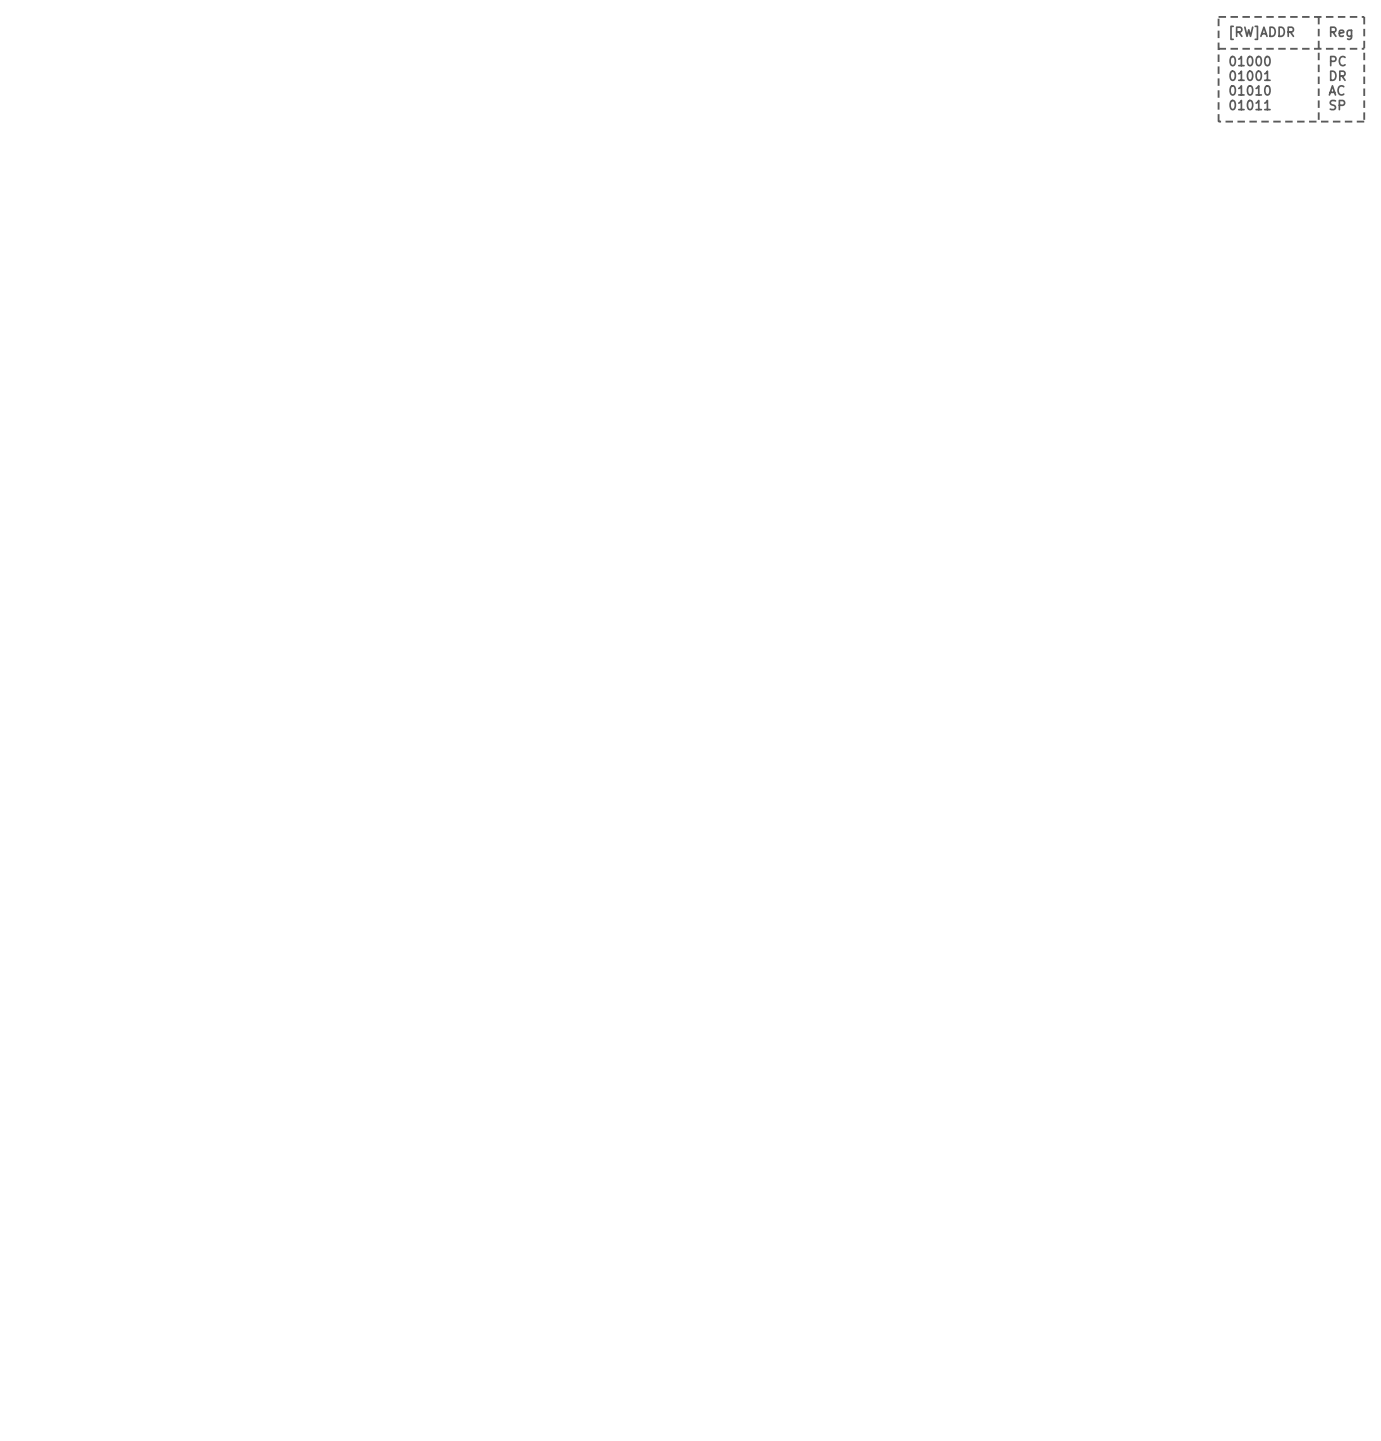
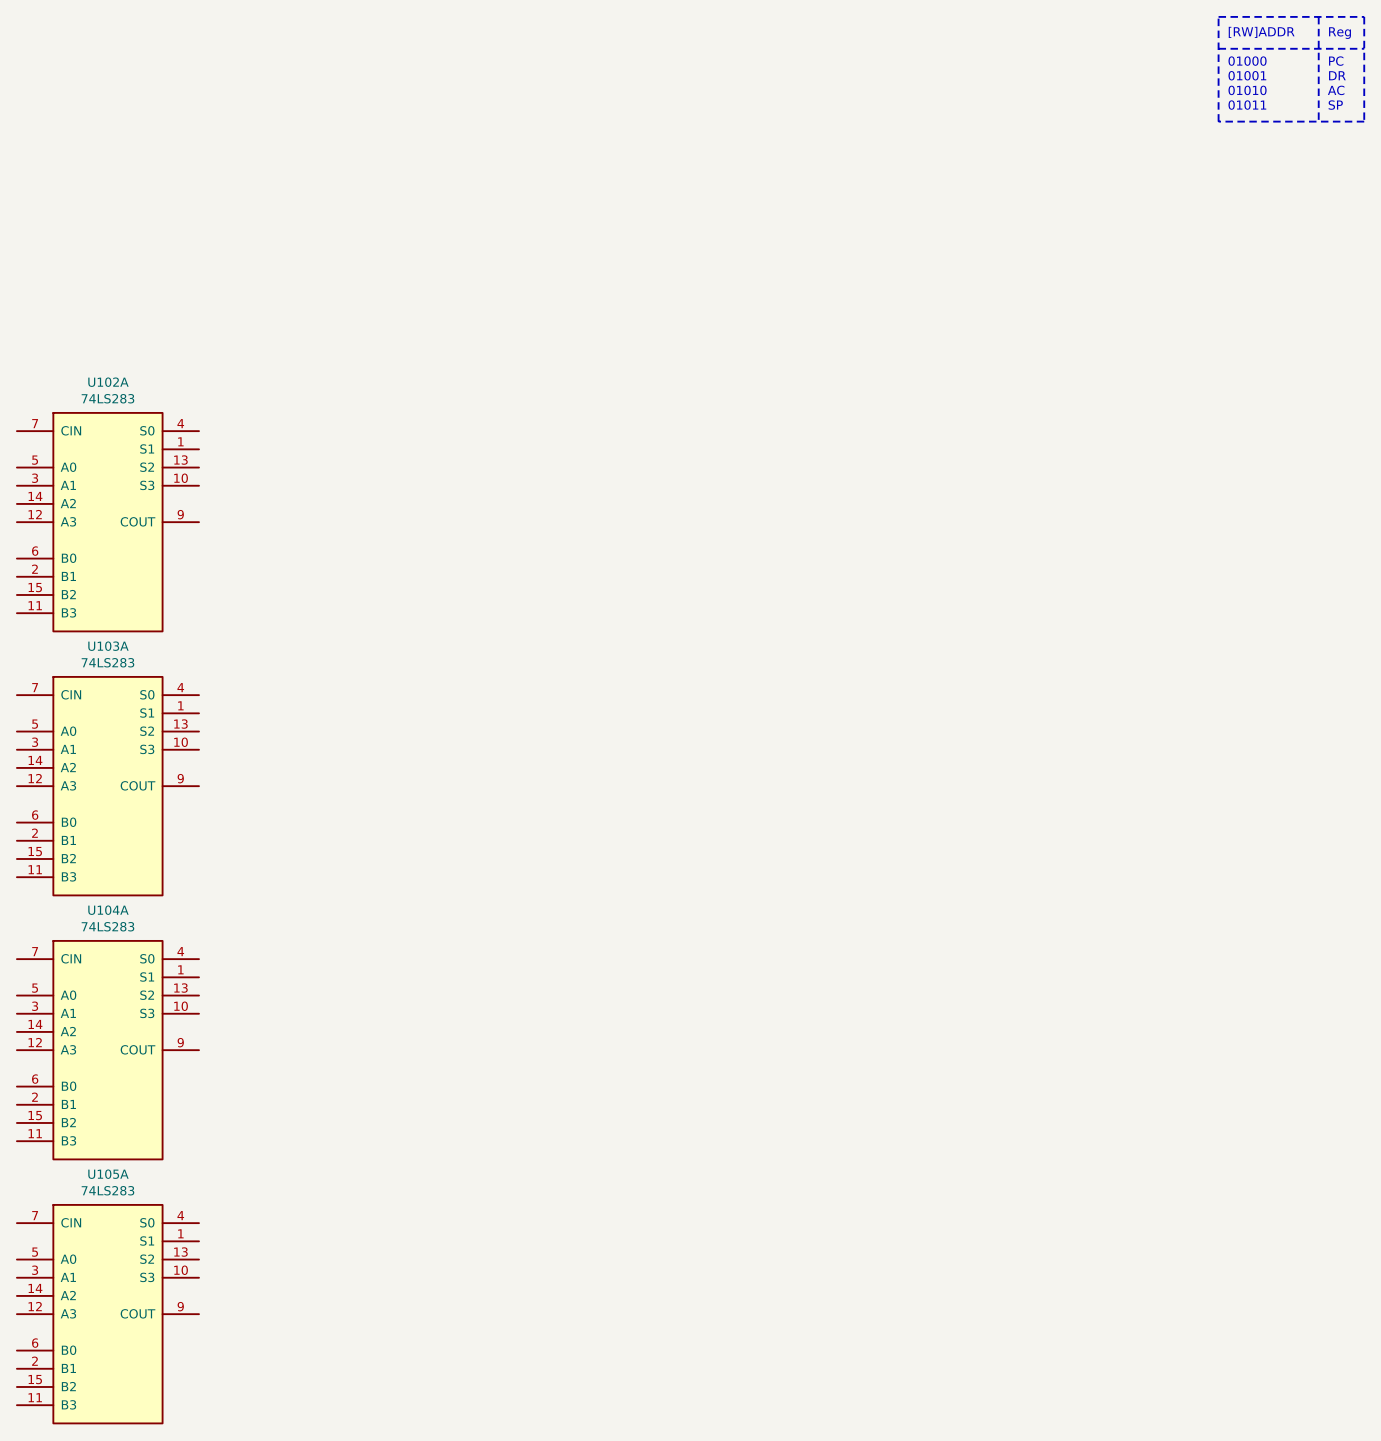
U102A: none -> 74LS283 (107, 522)
U103A: none -> 74LS283 (107, 786)
U104A: none -> 74LS283 (107, 1050)
U105A: none -> 74LS283 (107, 1314)

